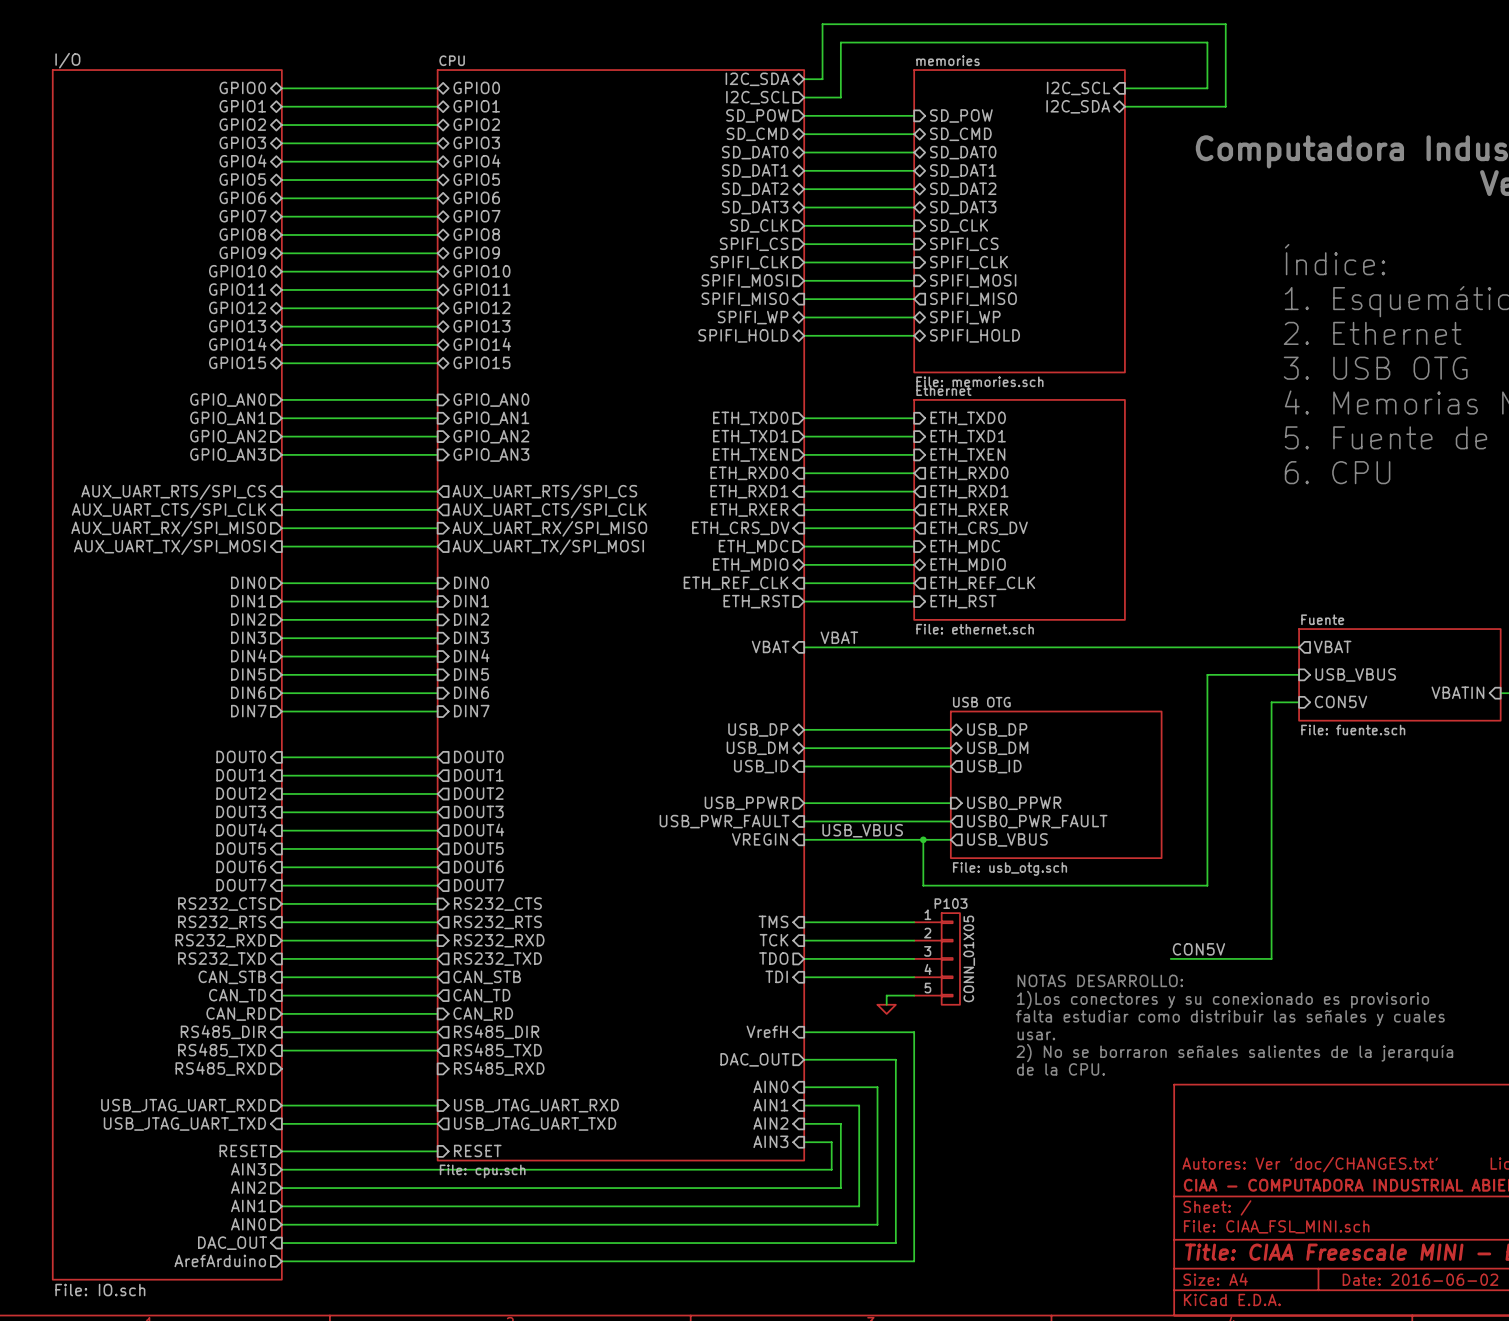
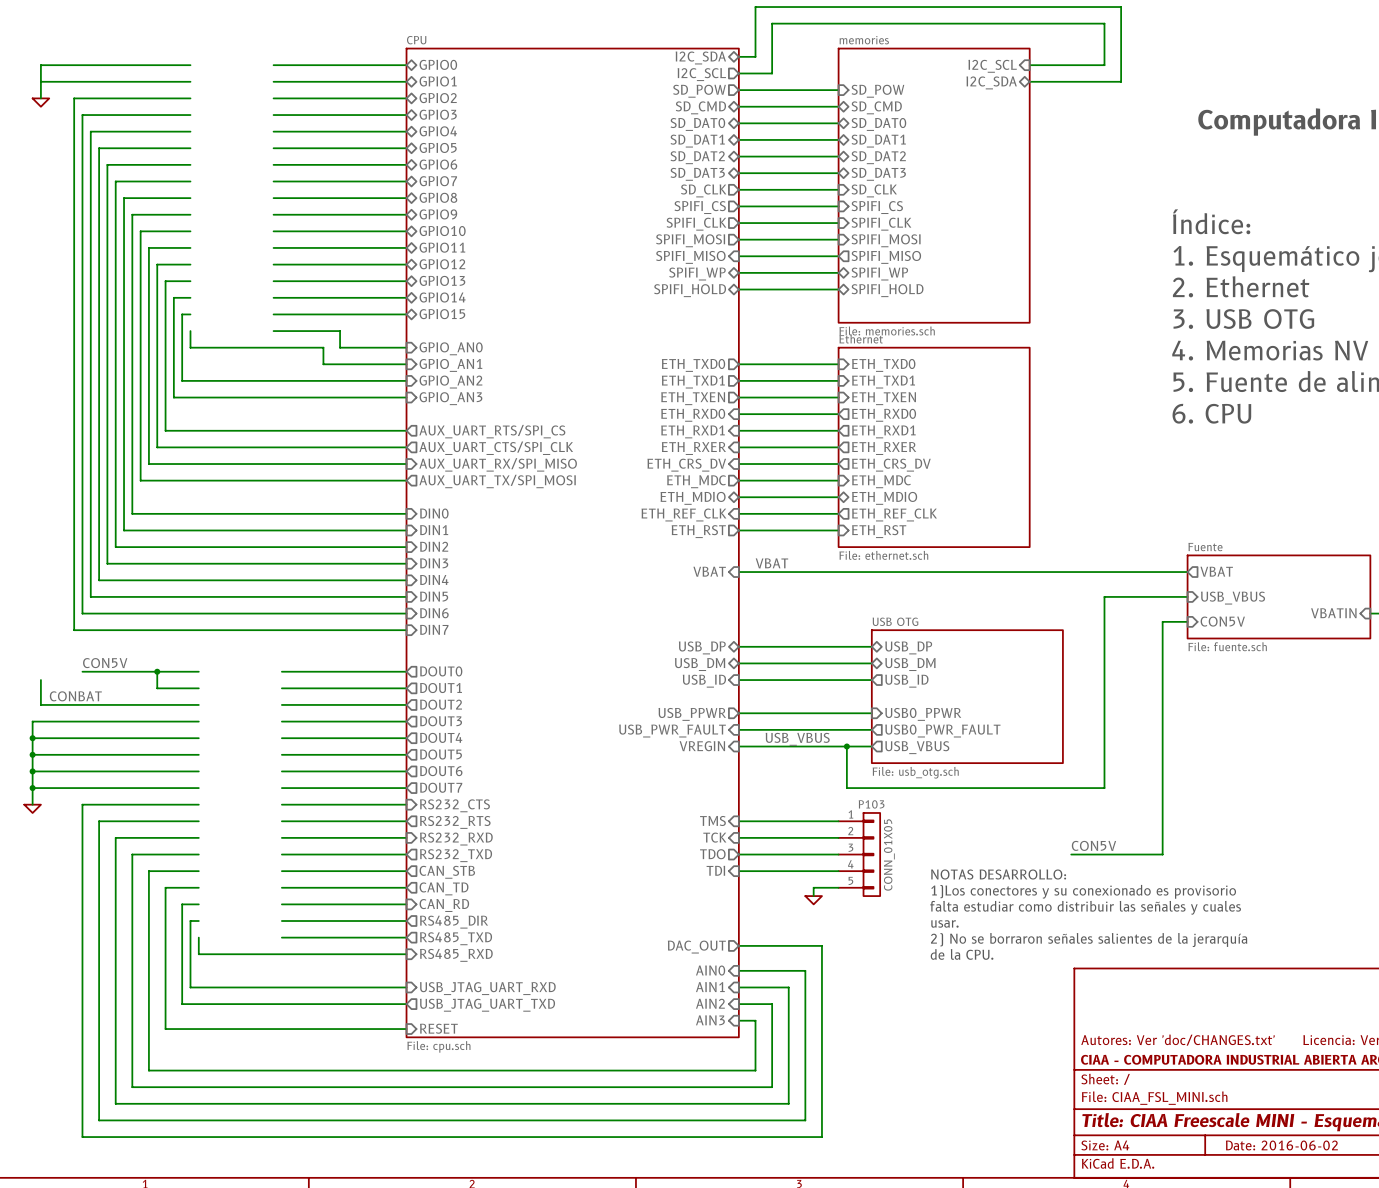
sheet pin: GPIO0 (242, 87) -> none
wire: none -> (190, 65) (40, 65) (40, 98)
wire: (281, 88) (291, 88) -> none
wire: none -> (40, 81) (190, 81)
sheet pin: GPIO1 (242, 106) -> none
wire: (281, 106) (291, 106) -> none
sheet pin: GPIO2 (242, 124) -> none
wire: none -> (190, 98) (74, 98) (74, 630) (265, 630)
wire: (281, 125) (291, 125) -> none
power symbol: none -> (40, 102)
sheet pin: GPIO3 (242, 142) -> none
wire: none -> (190, 115) (82, 115) (82, 613) (265, 613)
wire: (281, 143) (291, 143) -> none
wire: none -> (190, 131) (90, 131) (90, 596) (265, 596)
sheet pin: GPIO4 (243, 161) -> none
wire: (281, 161) (291, 161) -> none
sheet pin: GPIO5 (242, 179) -> none
wire: none -> (190, 148) (99, 148) (99, 580) (265, 580)
wire: (281, 180) (291, 180) -> none
sheet pin: GPIO6 (242, 197) -> none
wire: none -> (190, 164) (107, 164) (107, 563) (265, 563)
wire: (281, 198) (291, 198) -> none
wire: none -> (190, 181) (115, 181) (115, 547) (265, 547)
sheet pin: GPIO7 (243, 216) -> none
wire: (281, 216) (291, 216) -> none
wire: none -> (190, 198) (124, 198) (124, 530) (265, 530)
sheet pin: GPIO8 (242, 234) -> none
wire: (281, 234) (291, 234) -> none
sheet pin: GPIO9 (242, 252) -> none
wire: none -> (190, 214) (132, 214) (132, 513) (265, 513)
wire: (281, 253) (291, 253) -> none
wire: none -> (190, 231) (140, 231) (140, 480) (265, 480)
sheet pin: GPIO10 (237, 271) -> none
wire: (281, 271) (291, 271) -> none
wire: none -> (190, 247) (148, 247) (148, 464) (265, 464)
sheet pin: GPIO11 (237, 289) -> none
wire: (281, 289) (291, 289) -> none
sheet pin: GPIO12 (237, 307) -> none
wire: none -> (190, 264) (157, 264) (157, 447) (265, 447)
wire: (281, 308) (291, 308) -> none
wire: none -> (190, 281) (165, 281) (165, 430) (265, 430)
sheet pin: GPIO13 (237, 326) -> none
wire: (281, 326) (291, 326) -> none
wire: none -> (190, 297) (173, 297) (173, 397) (265, 397)
sheet pin: GPIO14 (237, 344) -> none
wire: (281, 344) (291, 344) -> none
sheet pin: GPIO15 (237, 362) -> none
wire: none -> (190, 314) (182, 314) (182, 380) (265, 380)
wire: (281, 363) (291, 363) -> none
wire: none -> (190, 331) (190, 347) (265, 347)
wire: none -> (273, 331) (340, 331) (340, 347)
wire: (346, 399) (364, 399) -> (323, 347) (323, 364)
sheet pin: GPIO_AN0 (228, 400) -> none
sheet pin: GPIO_AN1 (228, 418) -> none
wire: (281, 418) (346, 418) -> none
sheet pin: GPIO_AN2 (228, 436) -> none
sheet pin: GPIO_AN3 (228, 455) -> none
sheet pin: AUX_UART_RTS/SPI_CS (173, 492) -> none
sheet pin: AUX_UART_CTS/SPI_CLK (168, 510) -> none
sheet pin: AUX_UART_RX/SPI_MISO (168, 528) -> none
sheet pin: AUX_UART_TX/SPI_MOSI (169, 547) -> none
sheet pin: DIN0 (248, 582) -> none
sheet pin: DIN1 (248, 601) -> none
sheet pin: DIN2 (248, 619) -> none
sheet pin: DIN3 (248, 637) -> none
sheet pin: DIN4 (248, 655) -> none
sheet I/O: File: IO.sch (167, 674) -> none
sheet pin: DIN5 (248, 674) -> none
sheet pin: DIN6 (248, 692) -> none
sheet pin: DIN7 (248, 711) -> none
label: none -> CON5V (105, 663)
sheet pin: DOUT0 (241, 756) -> none
wire: none -> (82, 671) (198, 671)
wire: none -> (157, 671) (157, 688) (198, 688)
junction: none -> (157, 671)
wire: (281, 757) (300, 757) -> none
wire: none -> (40, 680) (40, 704) (198, 704)
sheet pin: DOUT1 (241, 775) -> none
wire: (281, 775) (300, 775) -> none
label: none -> CONBAT (75, 696)
sheet pin: DOUT2 (241, 793) -> none
wire: (281, 793) (300, 793) -> none
sheet pin: DOUT3 (241, 811) -> none
wire: none -> (198, 721) (32, 721) (32, 804)
wire: (281, 812) (300, 812) -> none
sheet pin: DOUT4 (241, 829) -> none
wire: none -> (32, 738) (198, 738)
junction: none -> (32, 738)
wire: (281, 830) (300, 830) -> none
wire: none -> (32, 754) (198, 754)
junction: none -> (32, 754)
sheet pin: DOUT5 (241, 848) -> none
wire: (281, 848) (300, 848) -> none
sheet pin: DOUT6 (241, 866) -> none
wire: none -> (32, 771) (198, 771)
junction: none -> (32, 771)
wire: (281, 867) (300, 867) -> none
wire: none -> (32, 788) (198, 788)
junction: none -> (32, 788)
sheet pin: DOUT7 (241, 885) -> none
wire: (281, 885) (300, 885) -> none
wire: (281, 903) (300, 903) -> none
sheet pin: RS232_CTS (222, 904) -> none
power symbol: none -> (32, 808)
sheet pin: RS232_RTS (222, 922) -> none
wire: (281, 922) (300, 922) -> none
sheet pin: RS232_RXD (220, 940) -> none
wire: (281, 940) (300, 940) -> none
wire: (281, 958) (300, 958) -> none
sheet pin: RS232_TXD (222, 959) -> none
sheet pin: CAN_STB (232, 977) -> none
wire: (281, 977) (300, 977) -> none
wire: none -> (198, 887) (165, 887) (165, 1029) (265, 1029)
sheet pin: CAN_TD (237, 995) -> none
wire: (281, 995) (300, 995) -> none
wire: none -> (198, 904) (182, 904) (182, 1004) (265, 1004)
wire: (281, 1013) (300, 1013) -> none
sheet pin: CAN_RD (236, 1014) -> none
sheet pin: VrefH (767, 1031) -> none
wire: none -> (198, 921) (190, 921) (190, 987) (265, 987)
sheet pin: RS485_DIR (223, 1032) -> none
wire: (281, 1032) (300, 1032) -> none
wire: (804, 1032) (914, 1032) (914, 1261) (281, 1261) -> none
wire: none -> (198, 937) (198, 954) (406, 954)
sheet pin: RS485_TXD (222, 1050) -> none
wire: (281, 1050) (300, 1050) -> none
sheet pin: RS485_RXD (220, 1068) -> none
sheet pin: USB_JTAG_UART_RXD (183, 1105) -> none
sheet pin: USB_JTAG_UART_TXD (184, 1124) -> none
wire: (822, 1142) (831, 1142) (831, 1169) (281, 1169) -> (755, 1020) (755, 1070) (148, 1070) (148, 871) (198, 871)
sheet pin: RESET (243, 1150) -> none
sheet pin: AIN3 (248, 1169) -> none
sheet pin: AIN2 (248, 1187) -> none
wire: (281, 1188) (840, 1188) -> (198, 854) (132, 854) (132, 1087) (772, 1087) (772, 1062)
sheet pin: AIN1 (248, 1205) -> none
wire: (281, 1206) (859, 1206) -> (198, 837) (115, 837) (115, 1103) (788, 1103) (788, 1078)
sheet pin: AIN0 (248, 1224) -> none
wire: (281, 1224) (877, 1224) -> (198, 821) (99, 821) (99, 1120) (805, 1120) (805, 1095)
sheet pin: DAC_OUT (232, 1243) -> none
wire: (281, 1243) (895, 1243) -> (198, 804) (82, 804) (82, 1137) (821, 1137) (821, 1112)
sheet pin: ArefArduino (220, 1260) -> none

